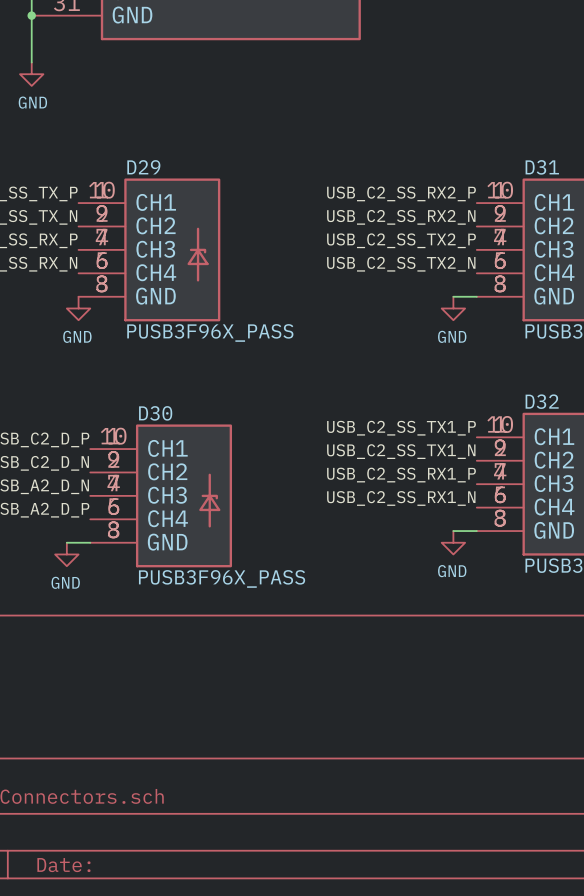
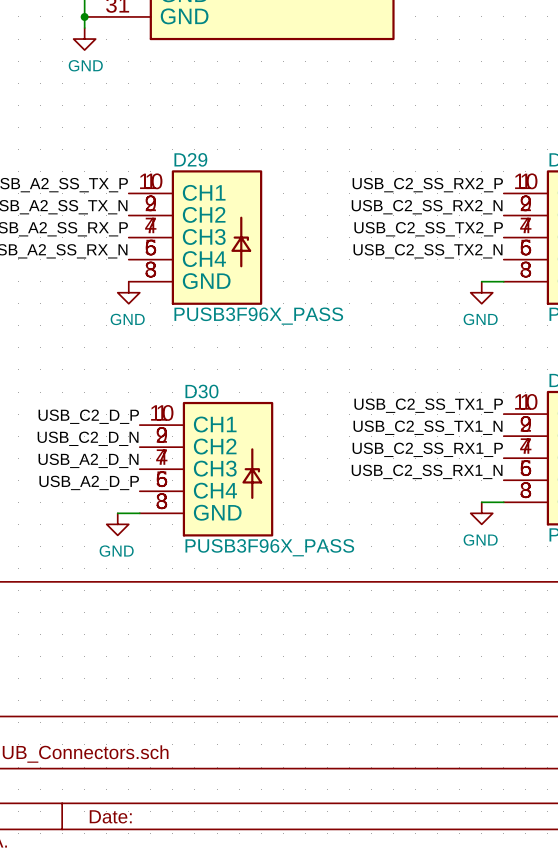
wire: (31, 27) (31, 62) -> none
power symbol position: GND (31, 74) -> GND (84, 39)

